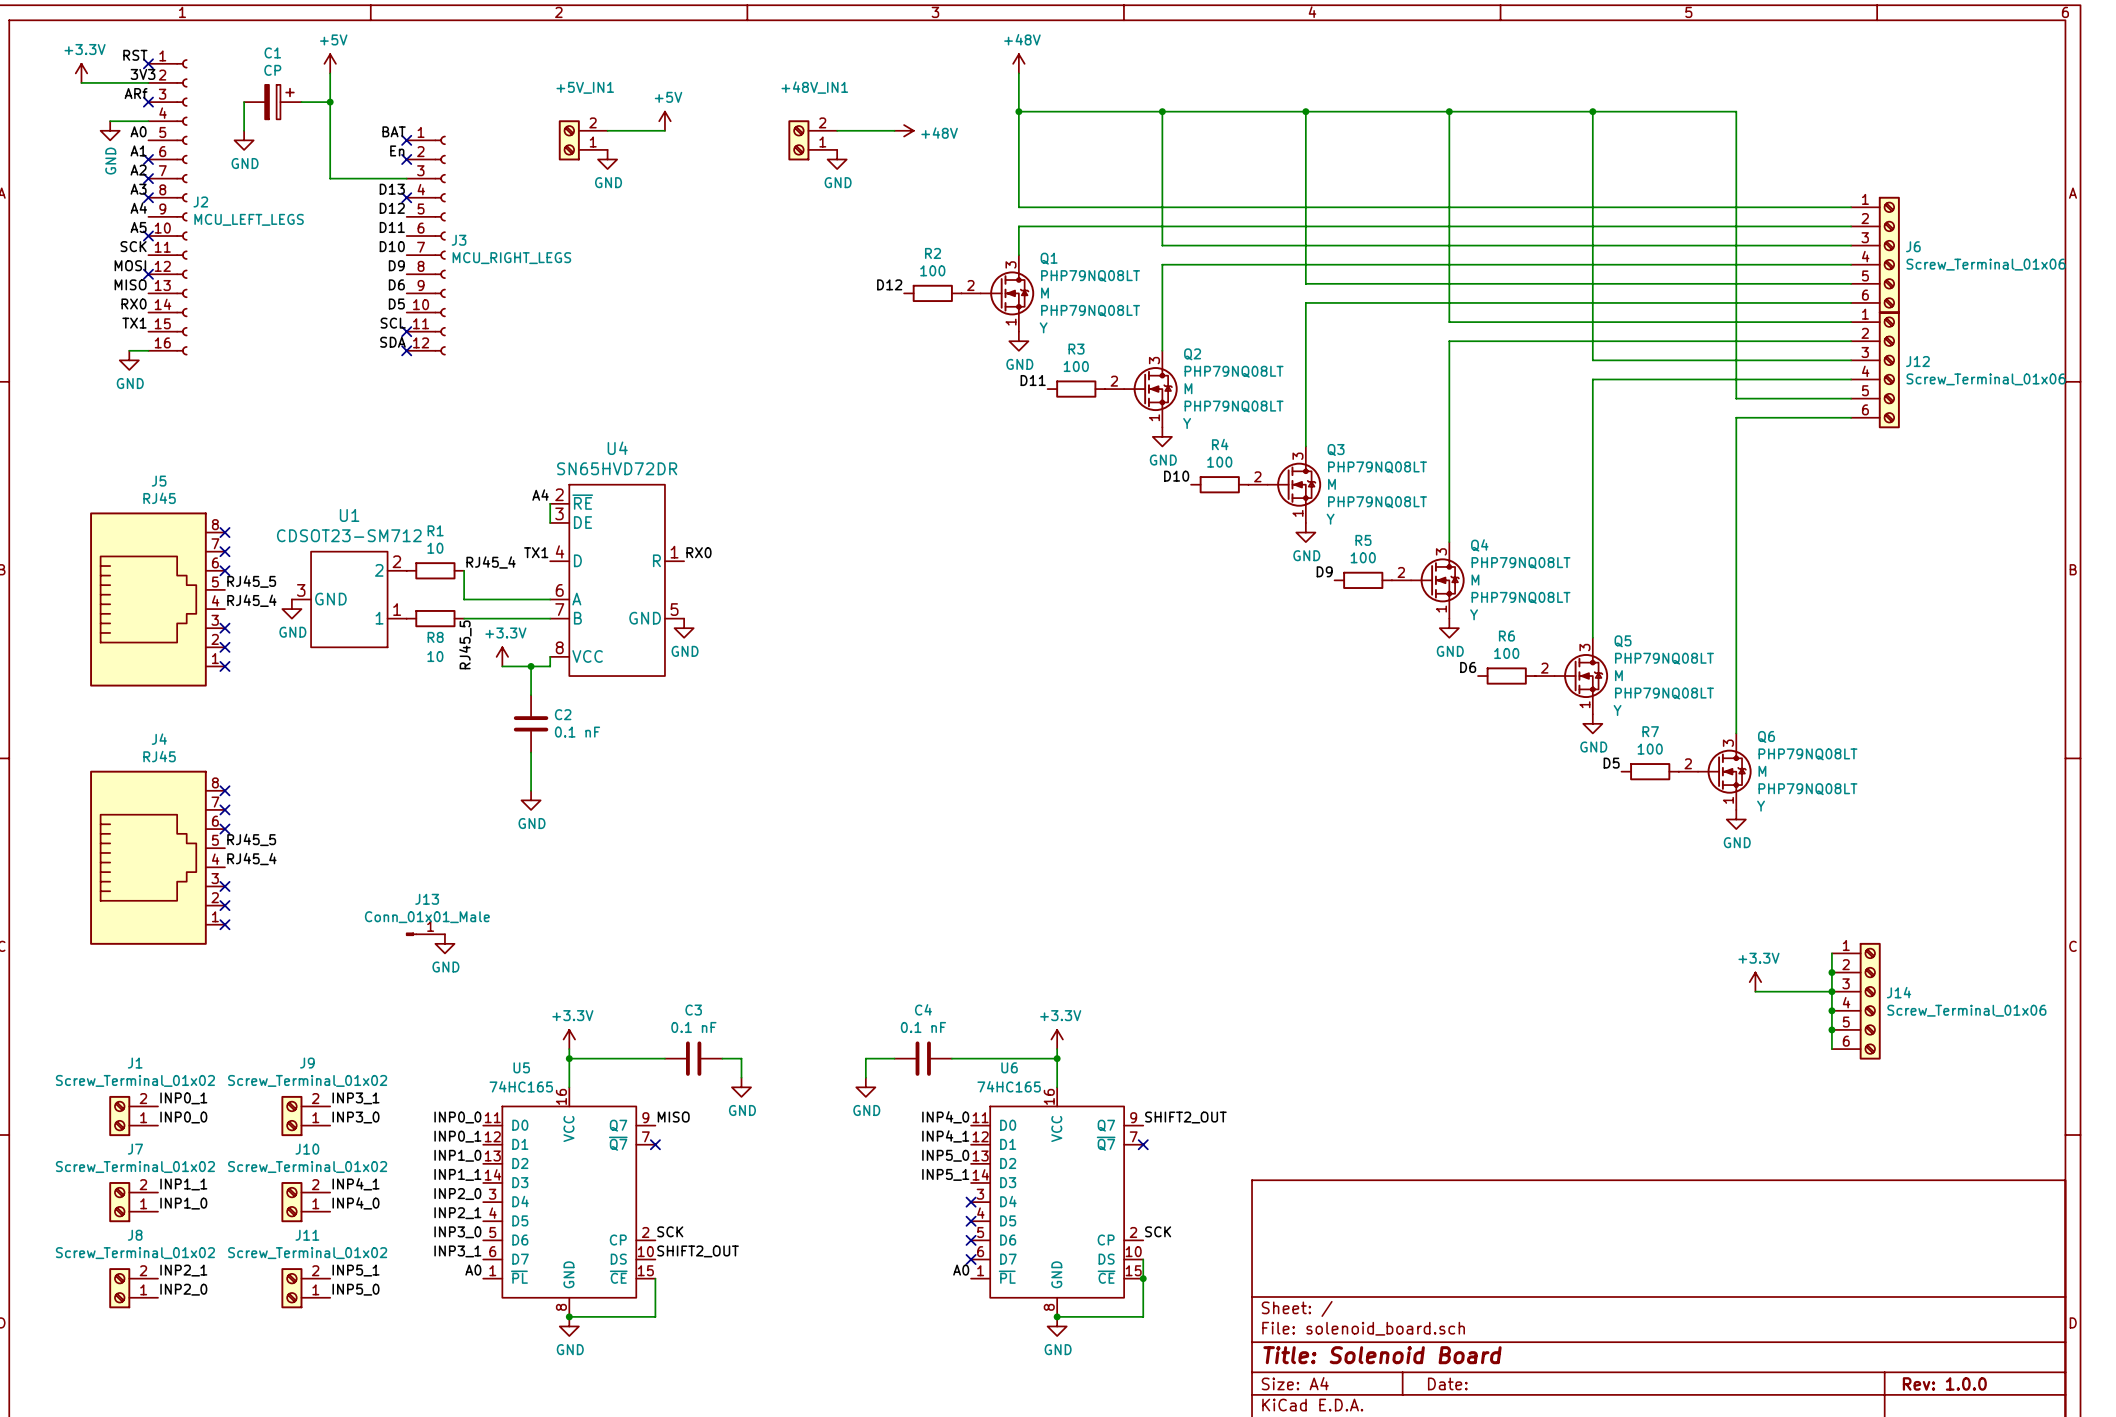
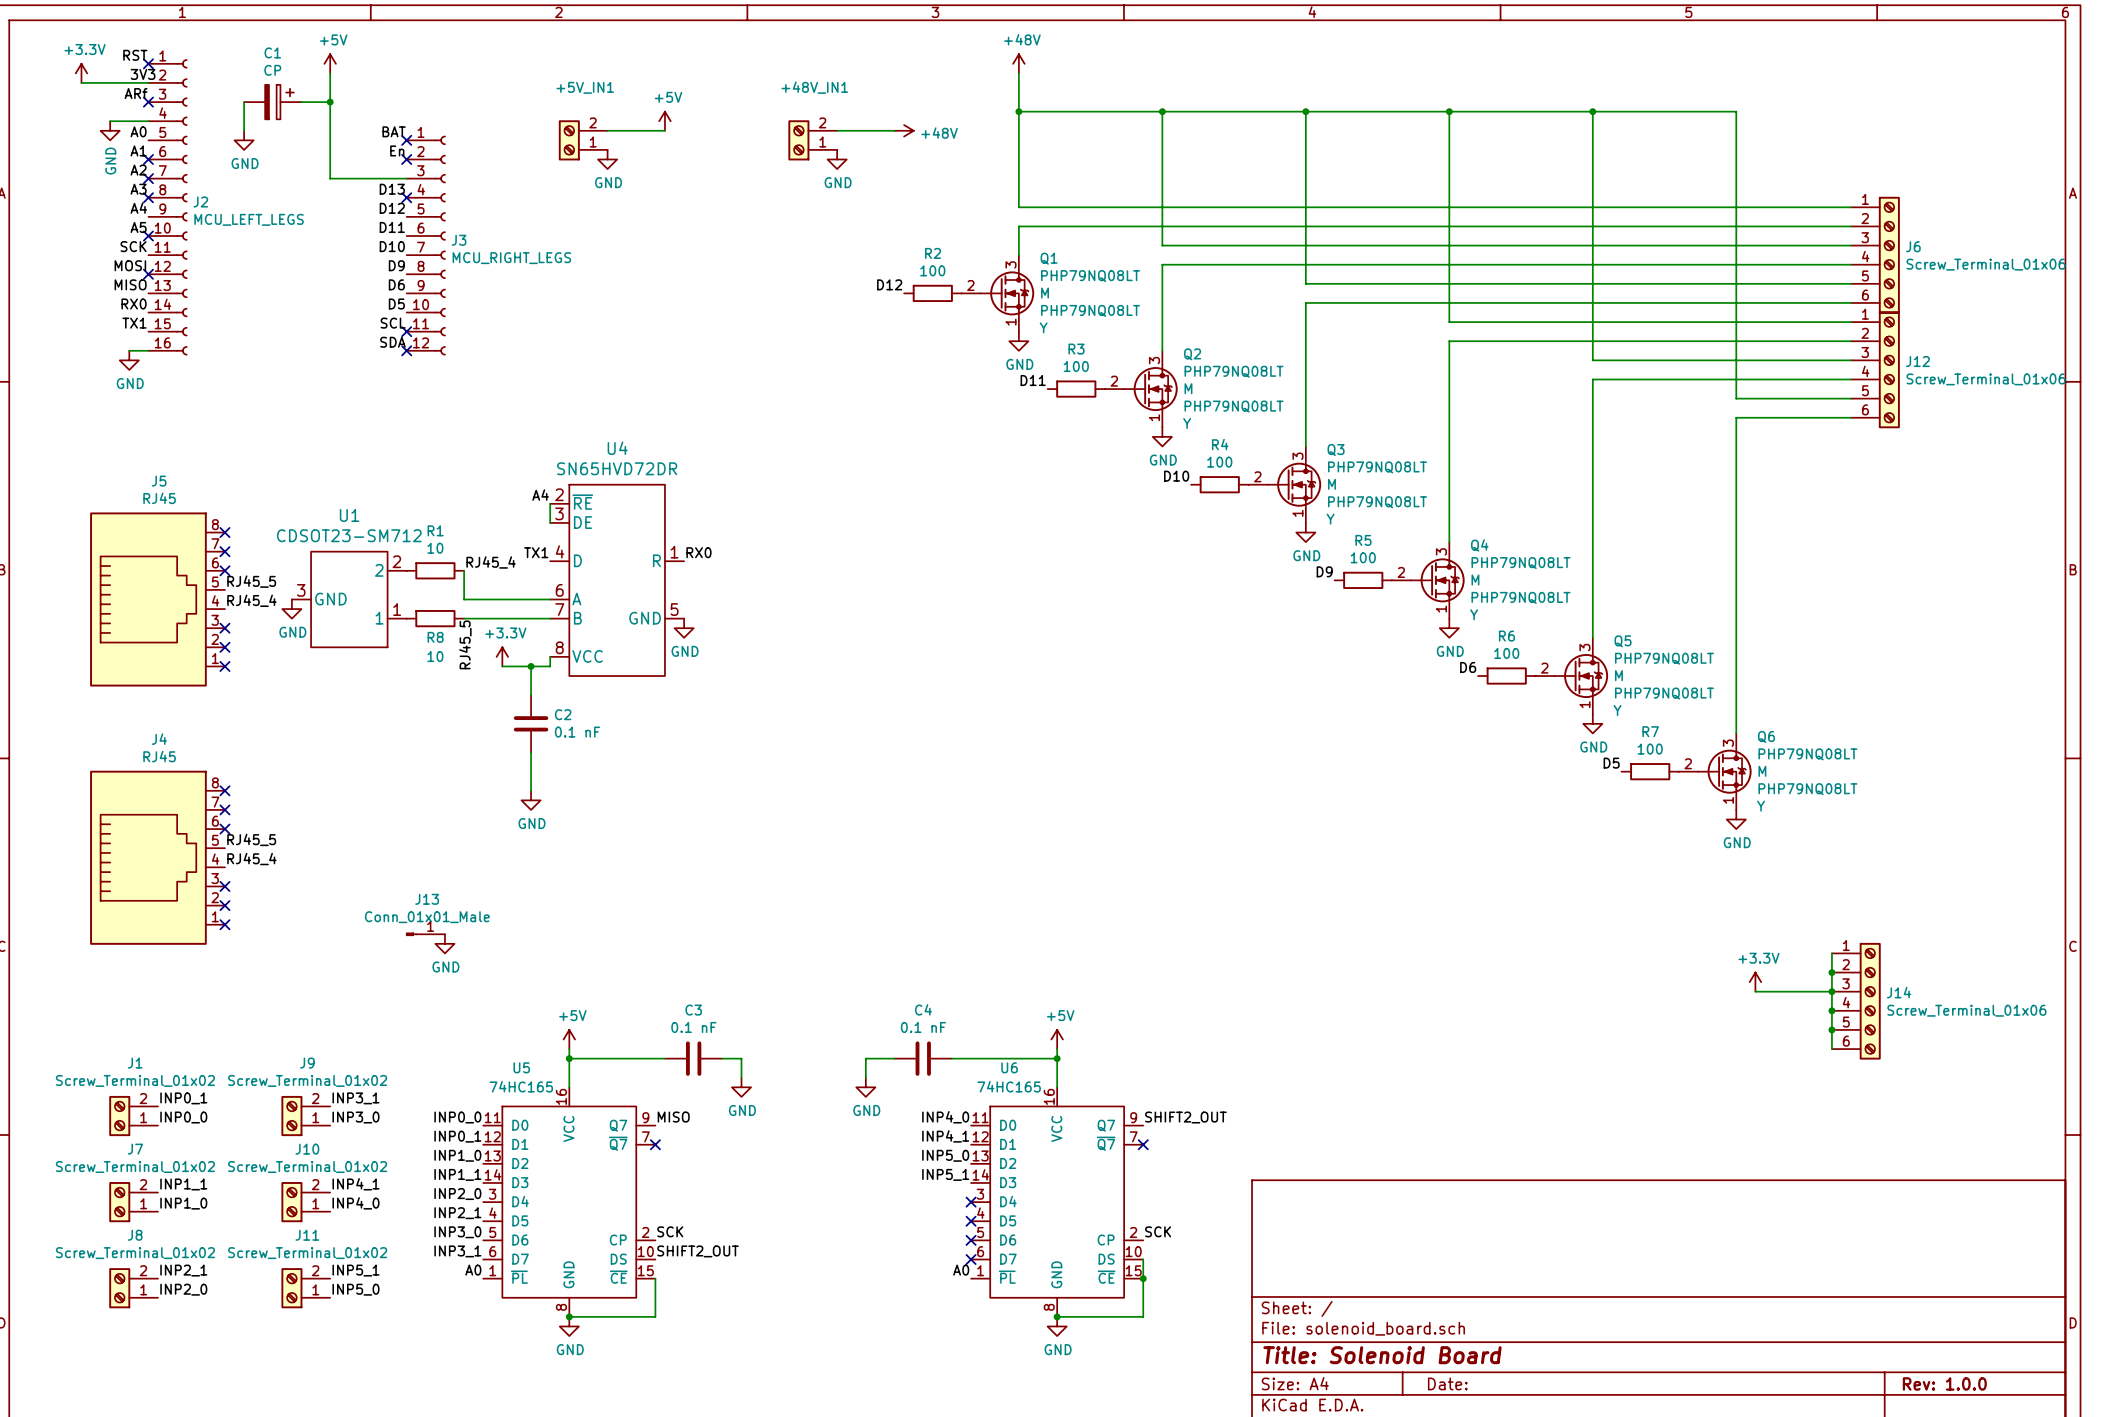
power symbol: +3.3V (569, 1039) -> +5V (569, 1039)
power symbol: +3.3V (1057, 1039) -> +5V (1057, 1039)

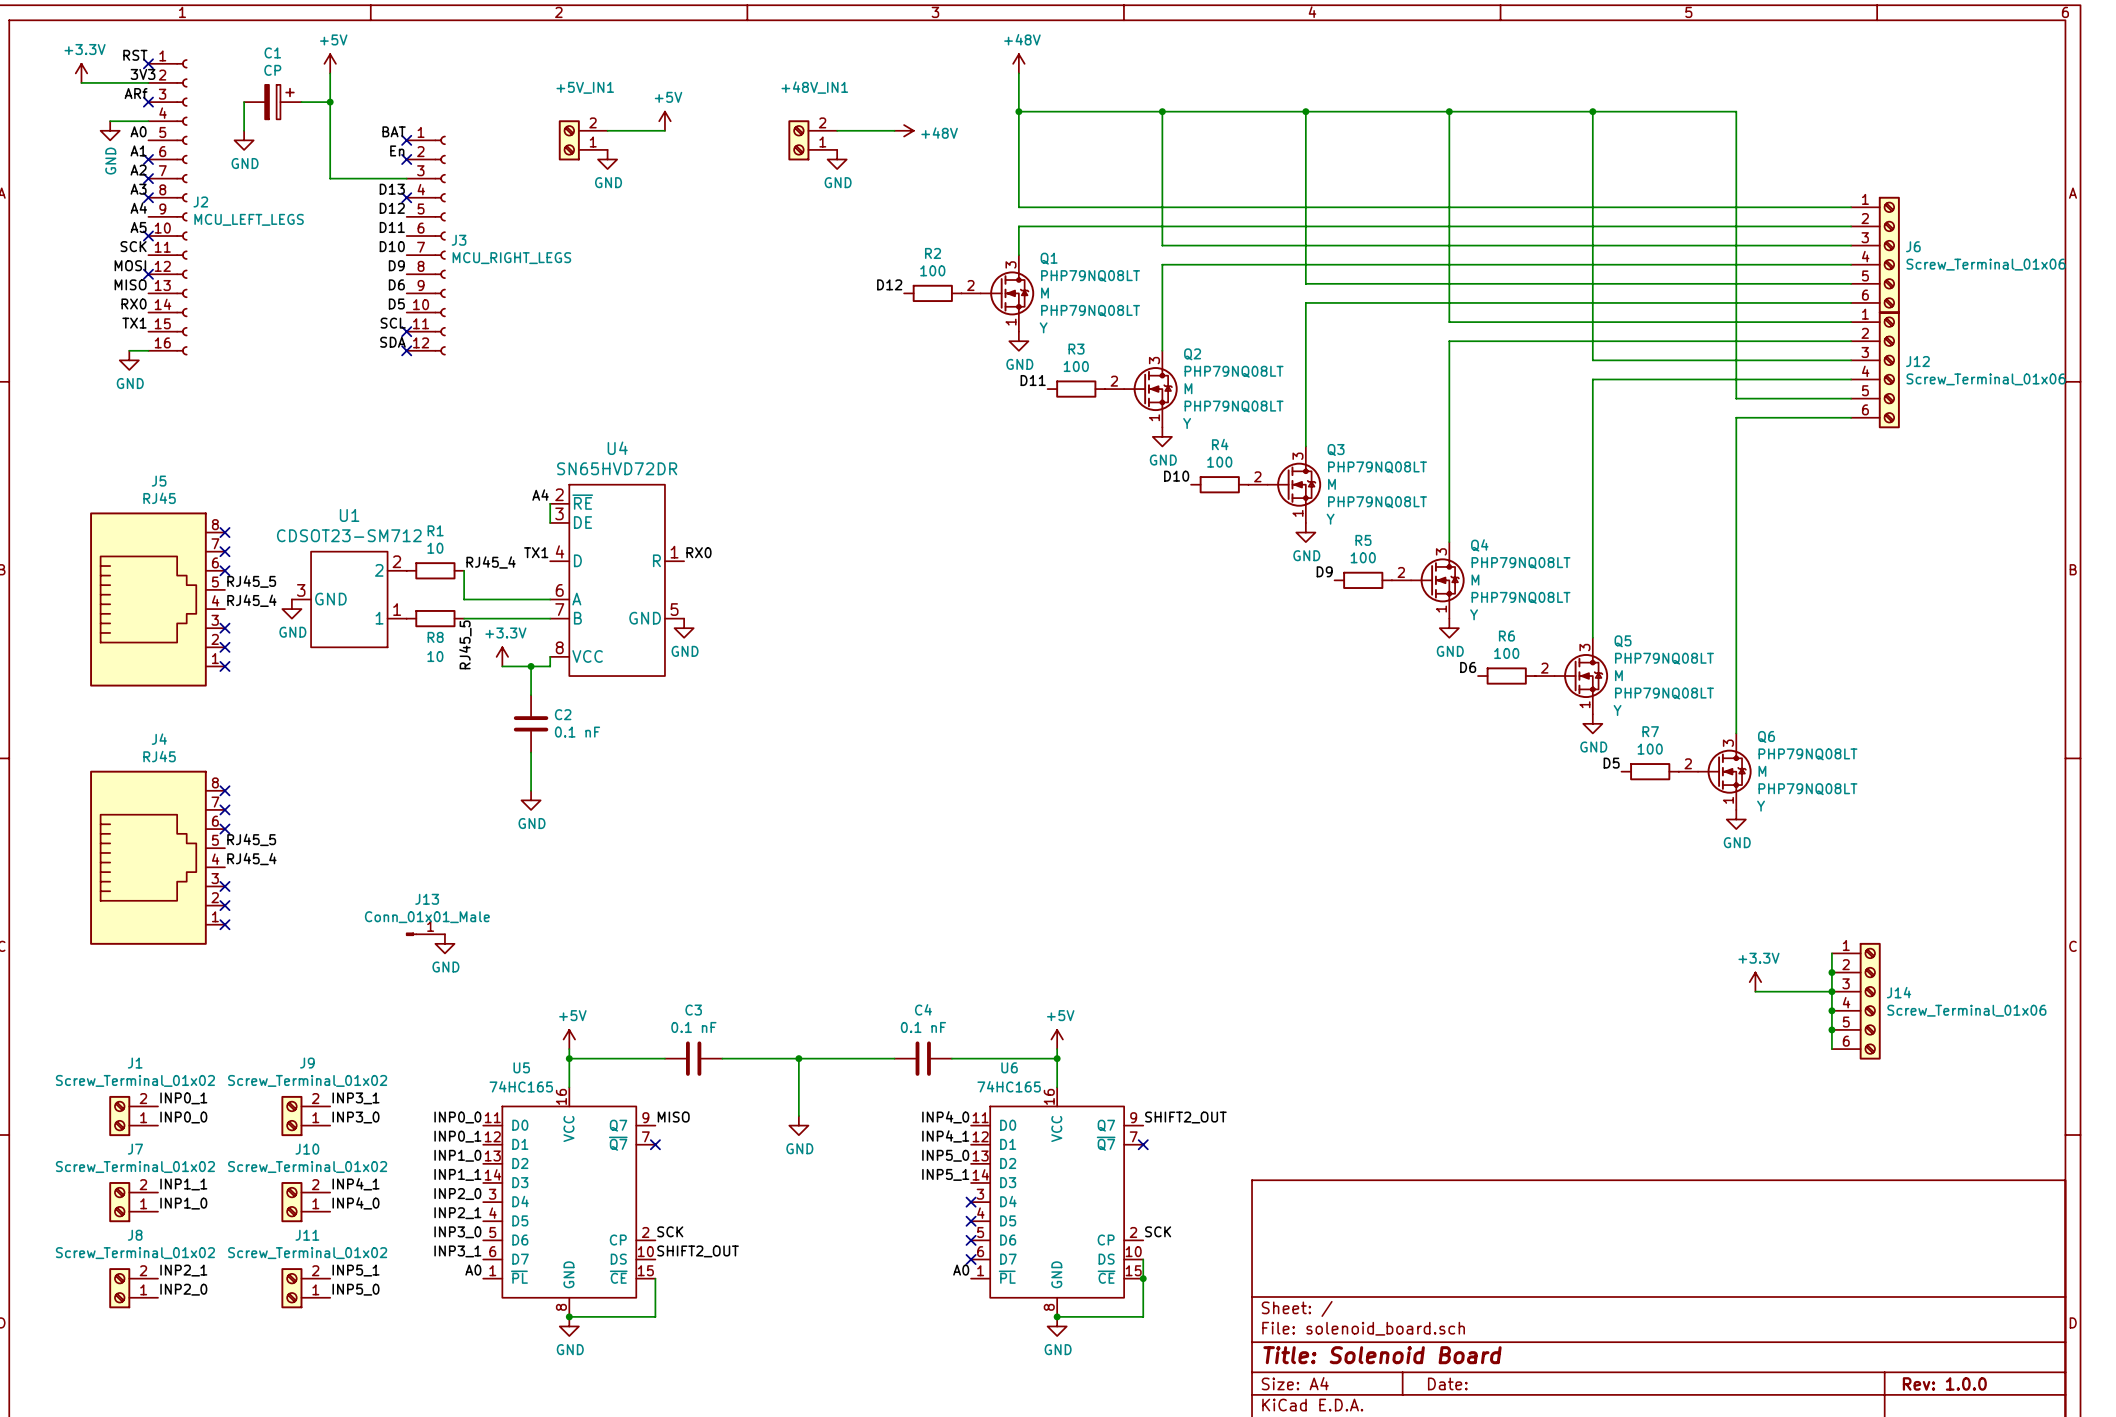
wire: (741, 1058) (741, 1077) -> (741, 1058) (865, 1058)
wire: none -> (798, 1058) (798, 1116)
junction: none -> (798, 1058)
wire: (865, 1058) (865, 1077) -> none
power symbol: GND (741, 1087) -> none
power symbol: GND (865, 1087) -> none
power symbol: none -> GND (798, 1125)

